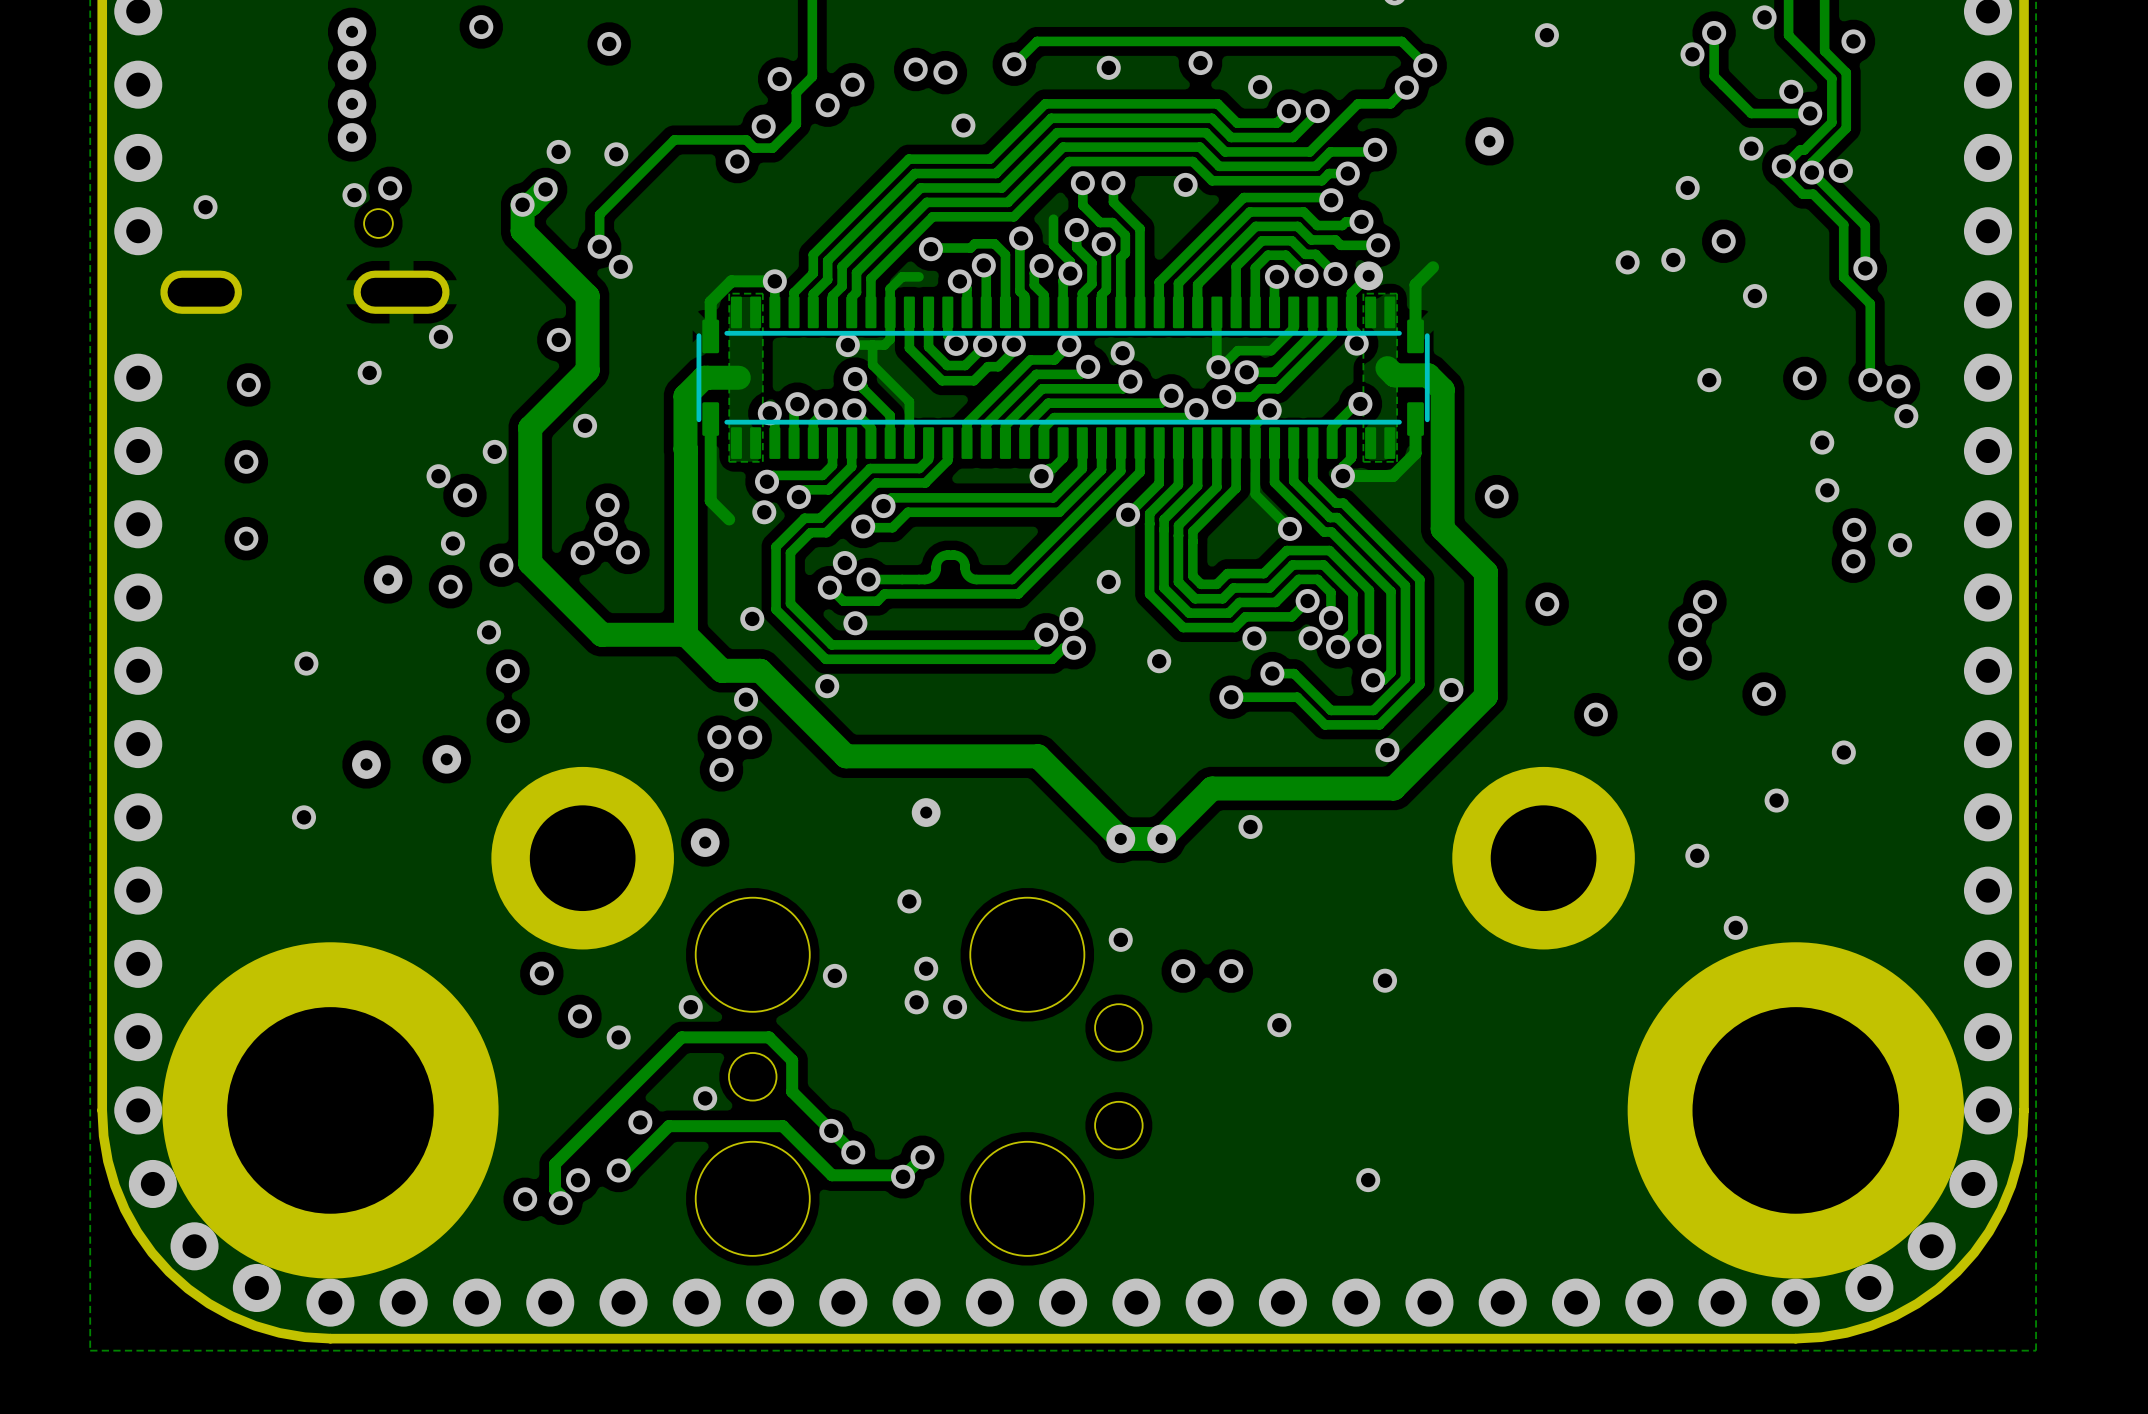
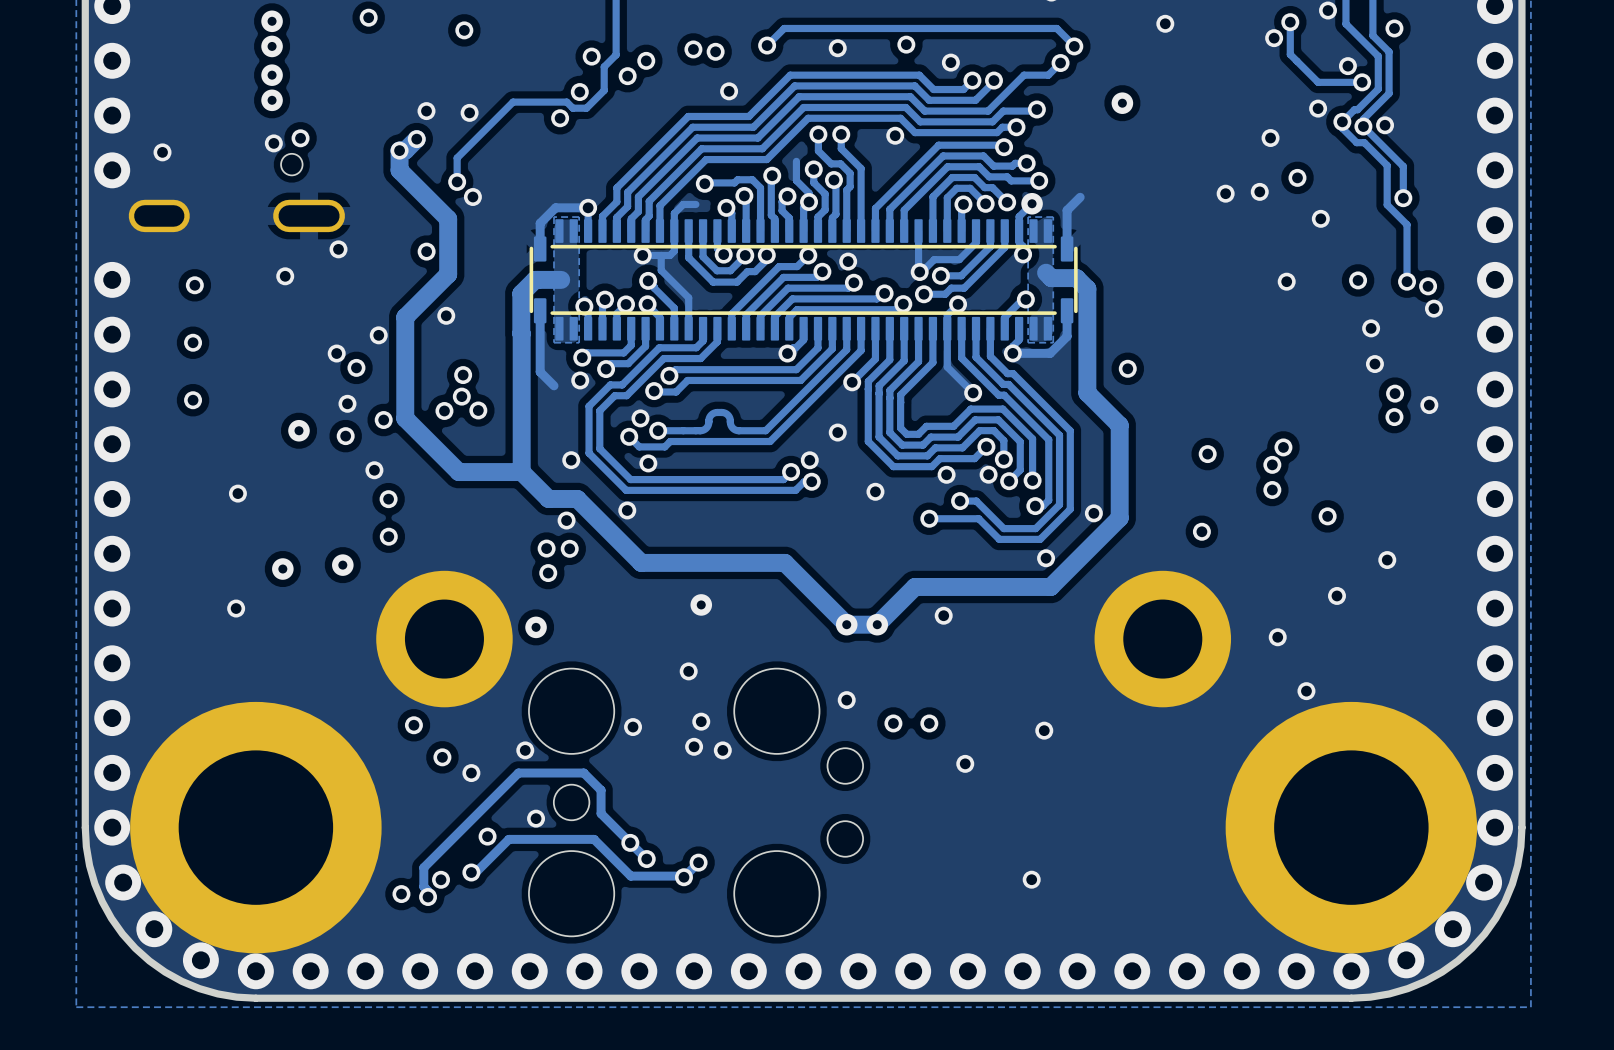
via position: (1547, 604) -> (1207, 454)

